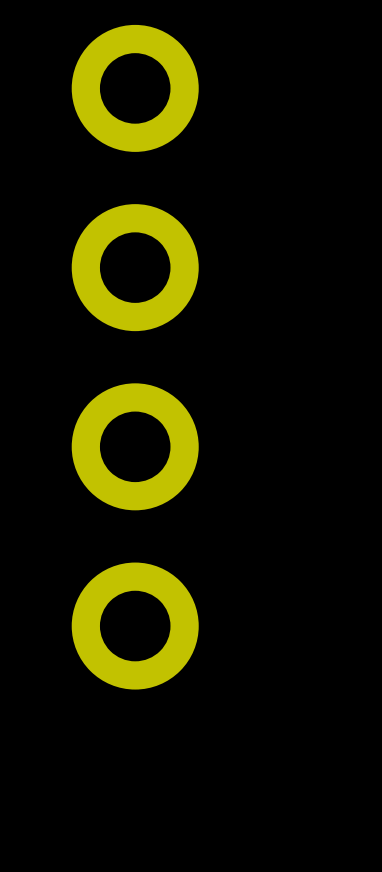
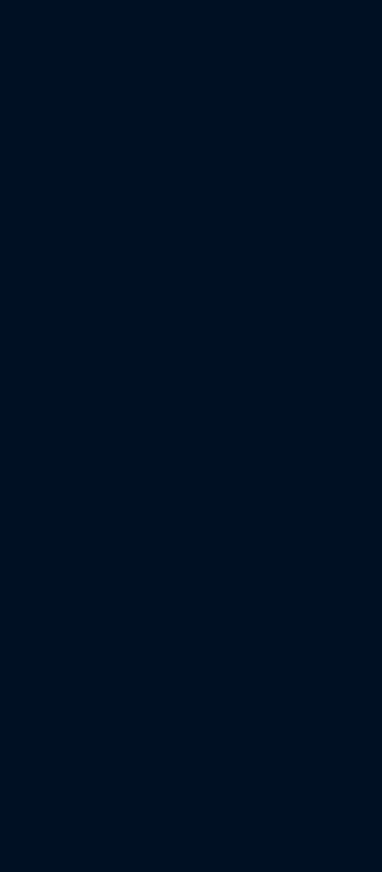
part: (135, 357) -> none

